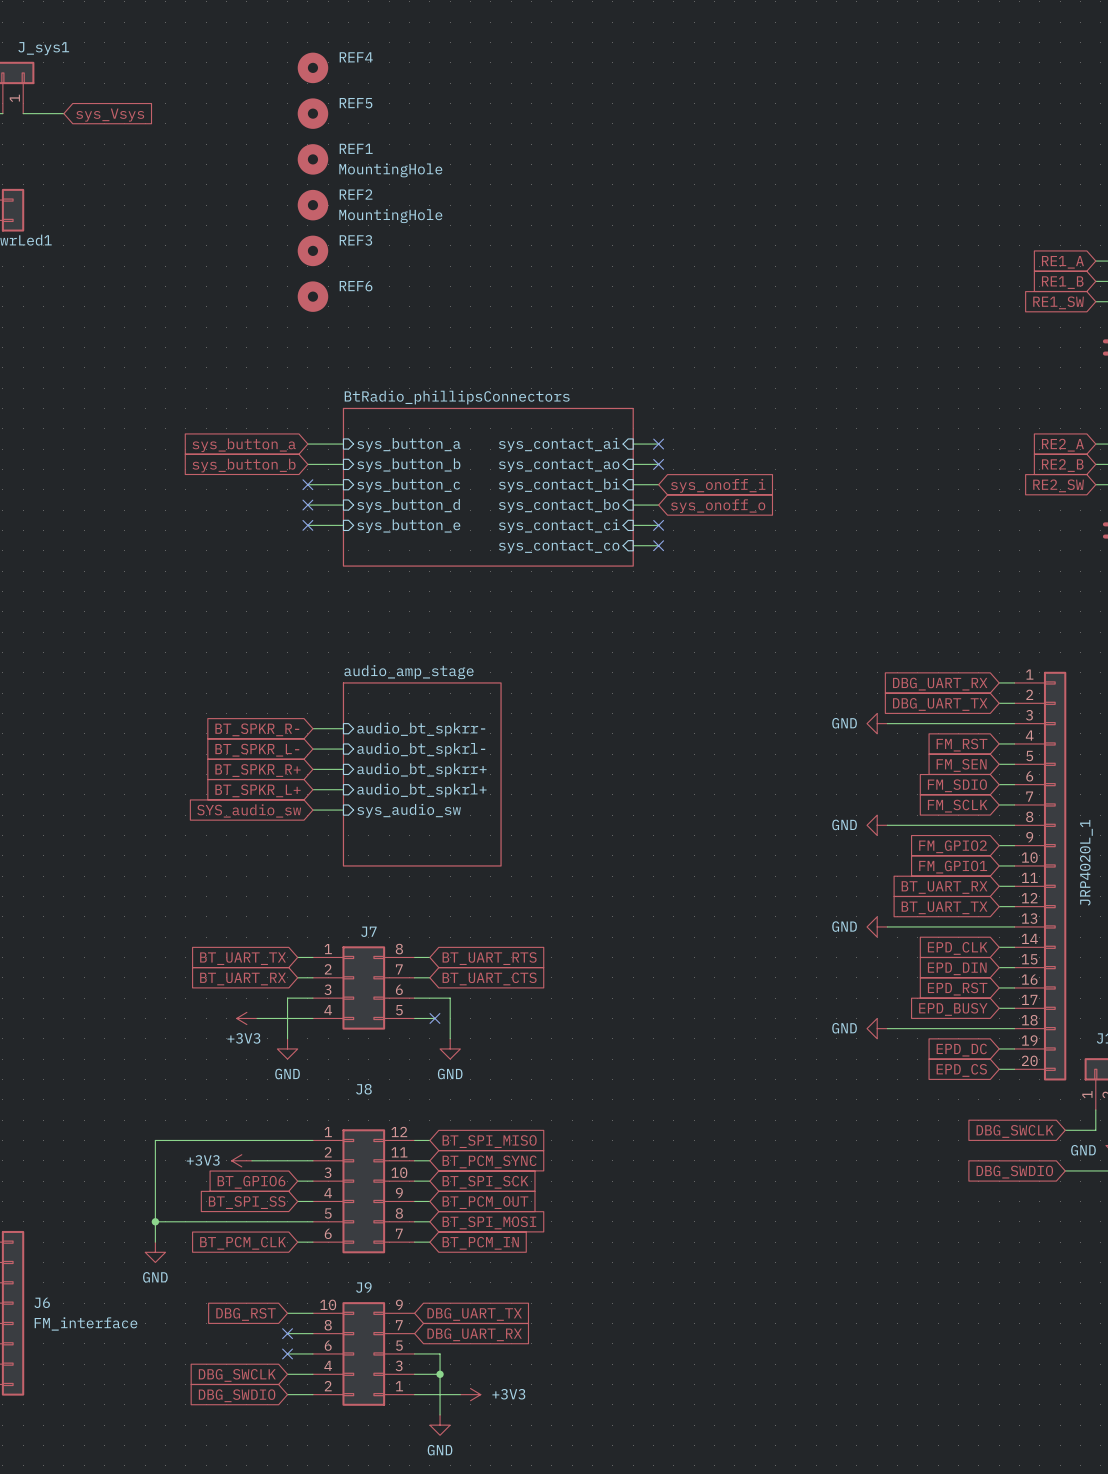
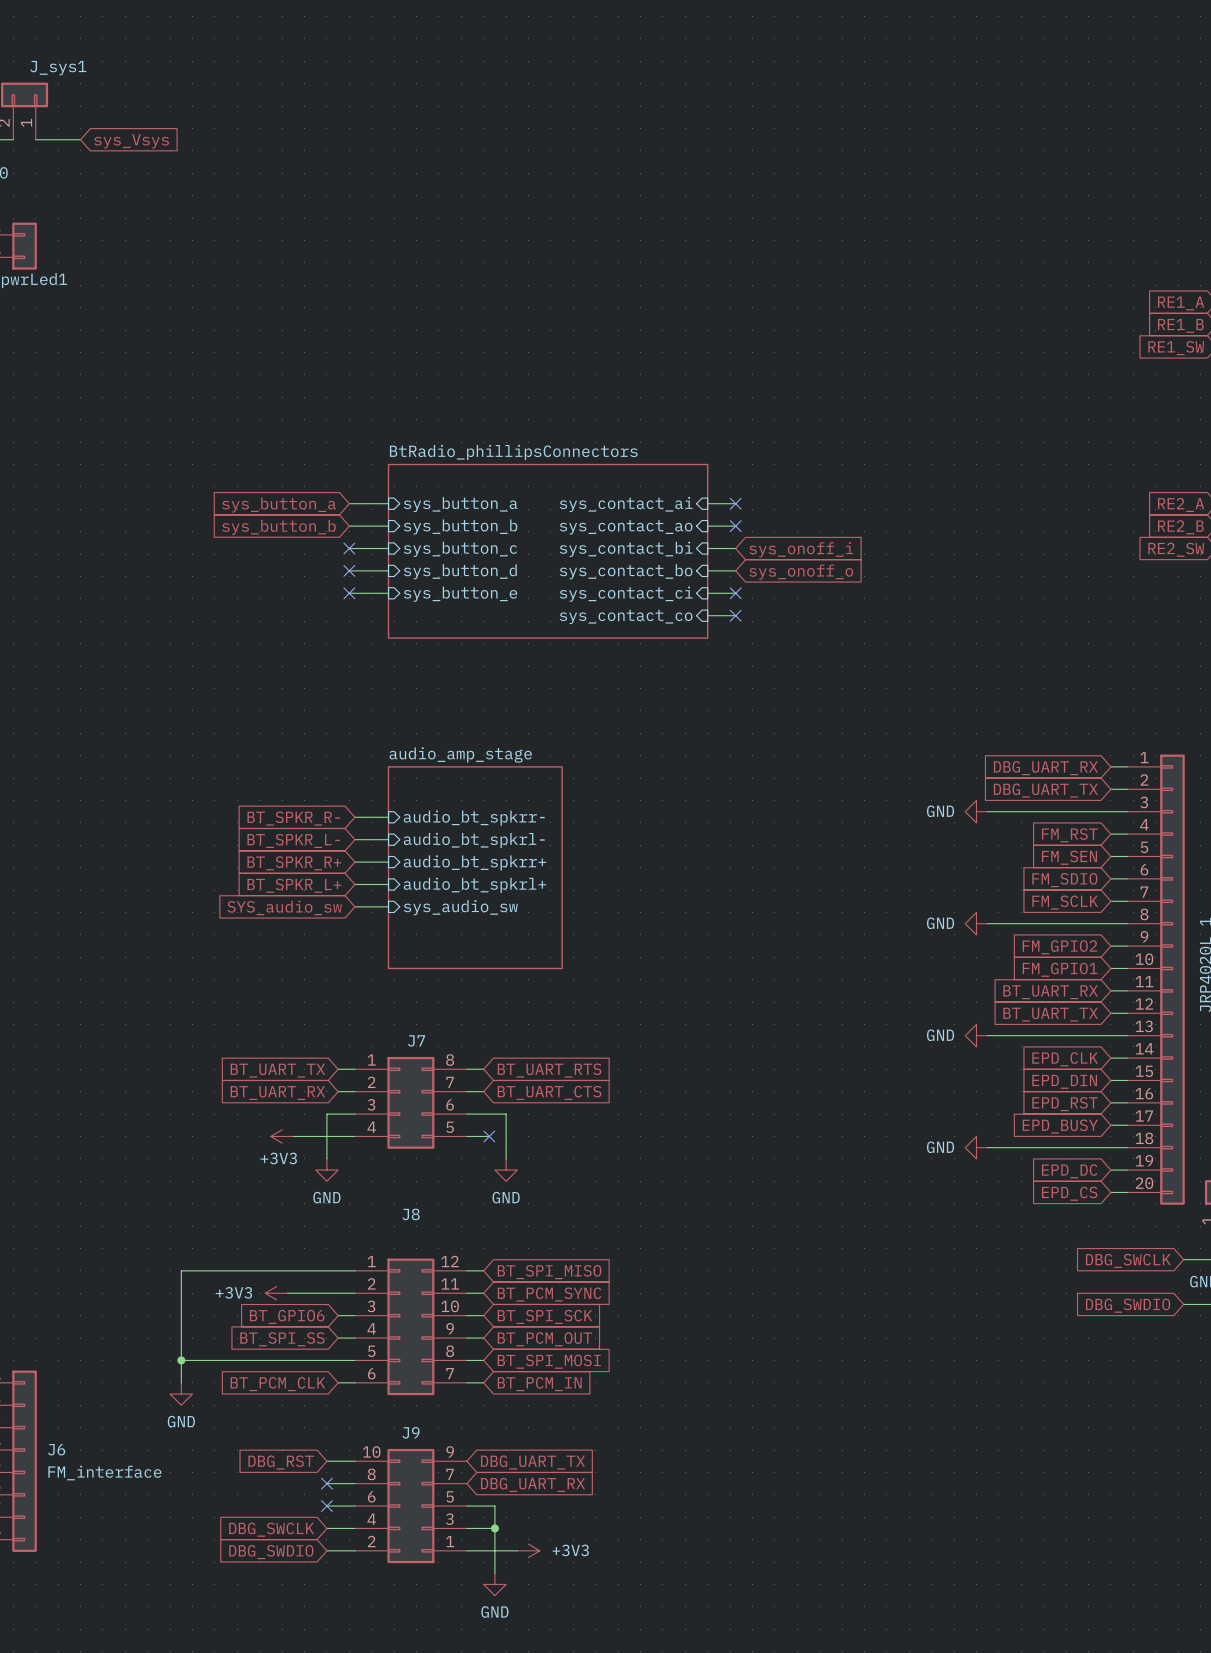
REF4: (312, 67) -> none
REF5: (312, 113) -> none
REF1: MountingHole (312, 159) -> none
REF2: MountingHole (312, 205) -> none
REF3: (312, 250) -> none
REF6: (312, 296) -> none

